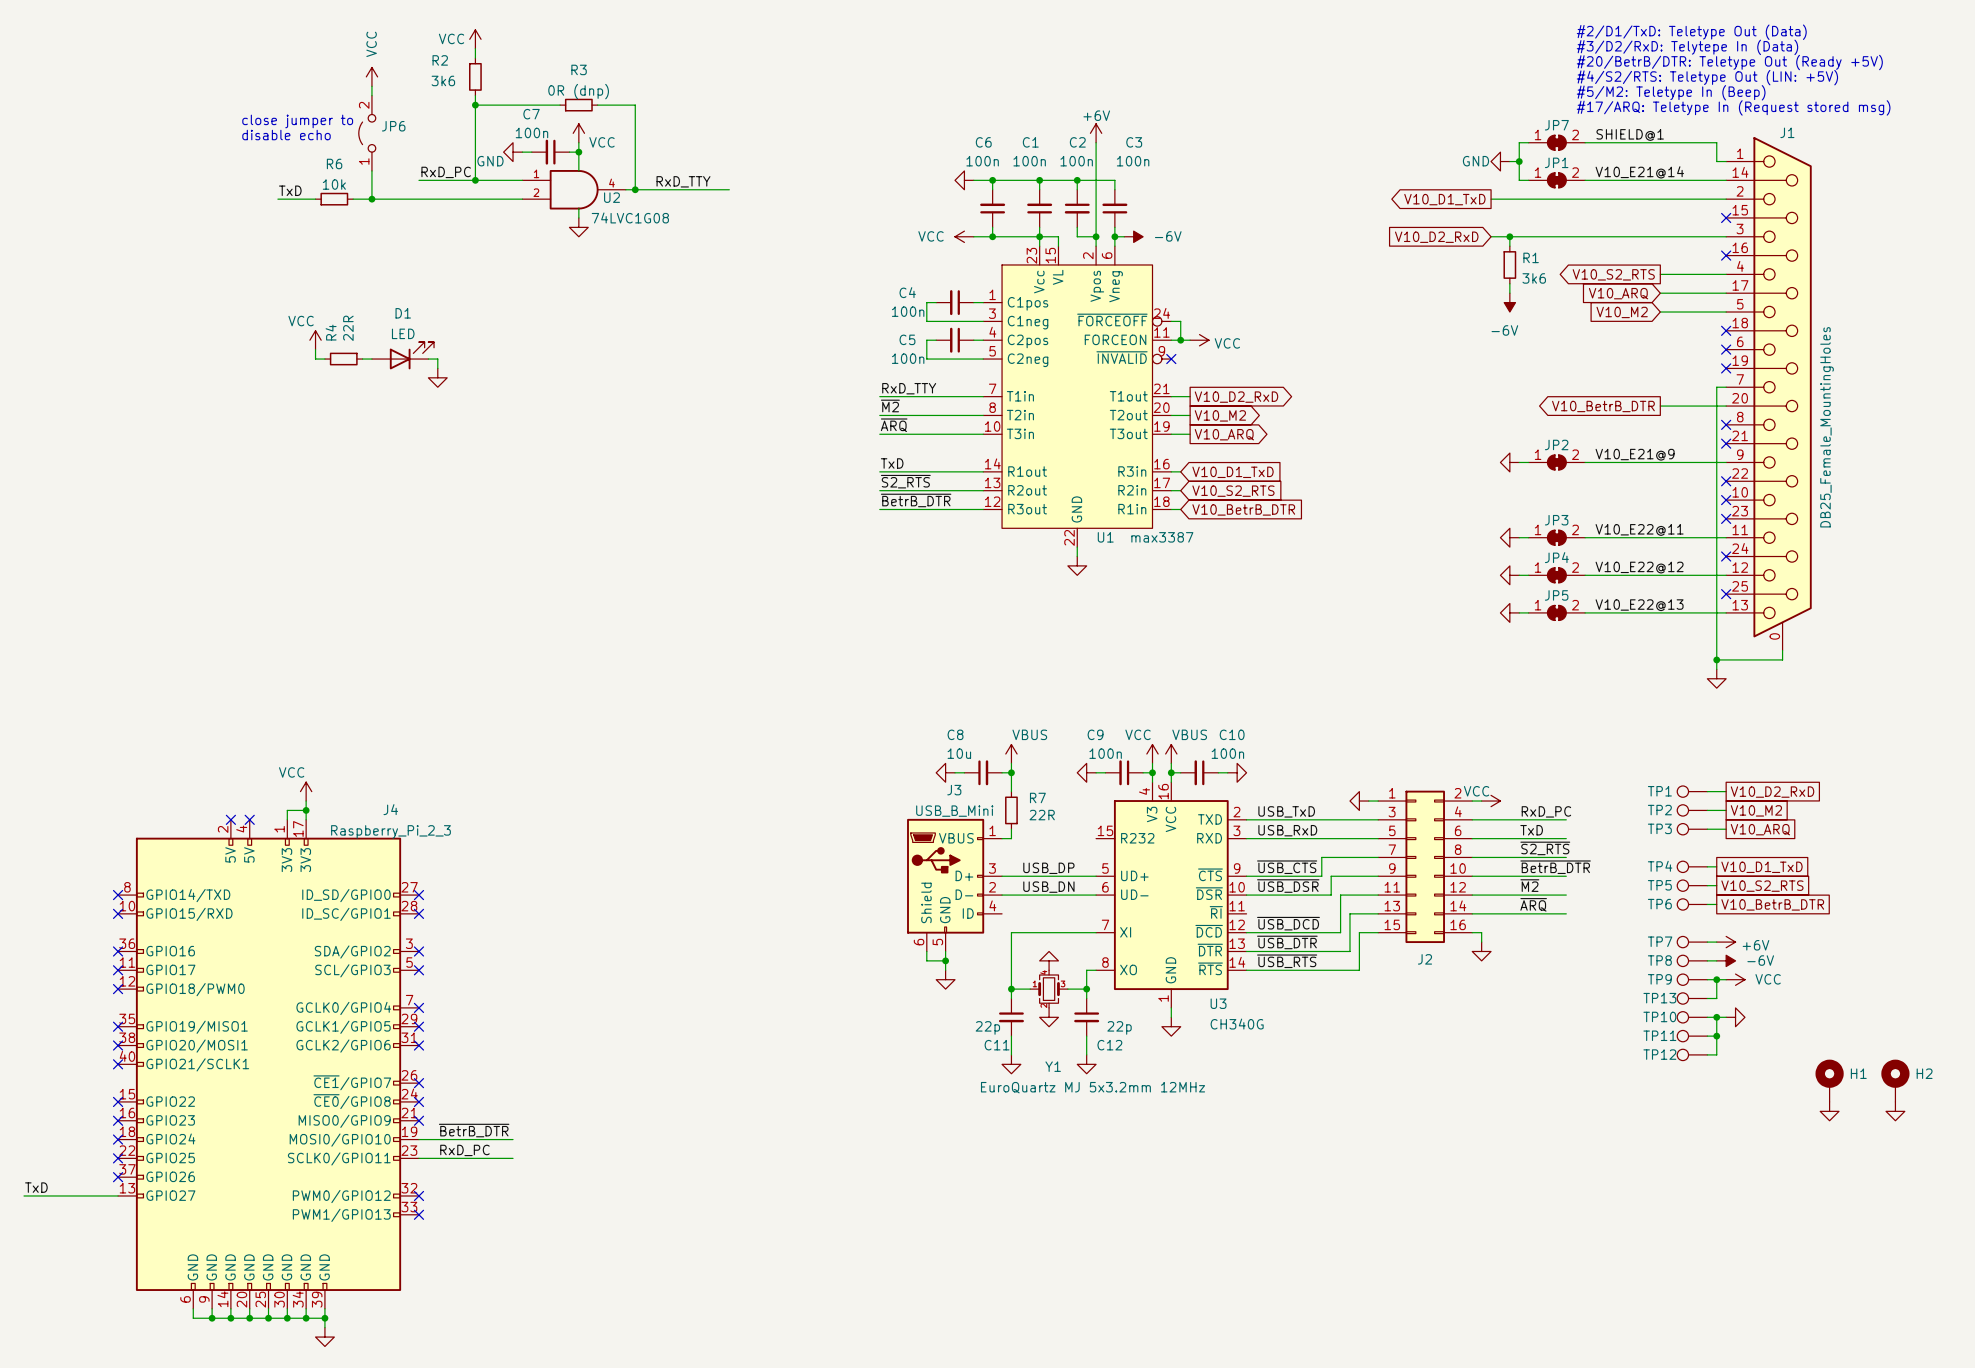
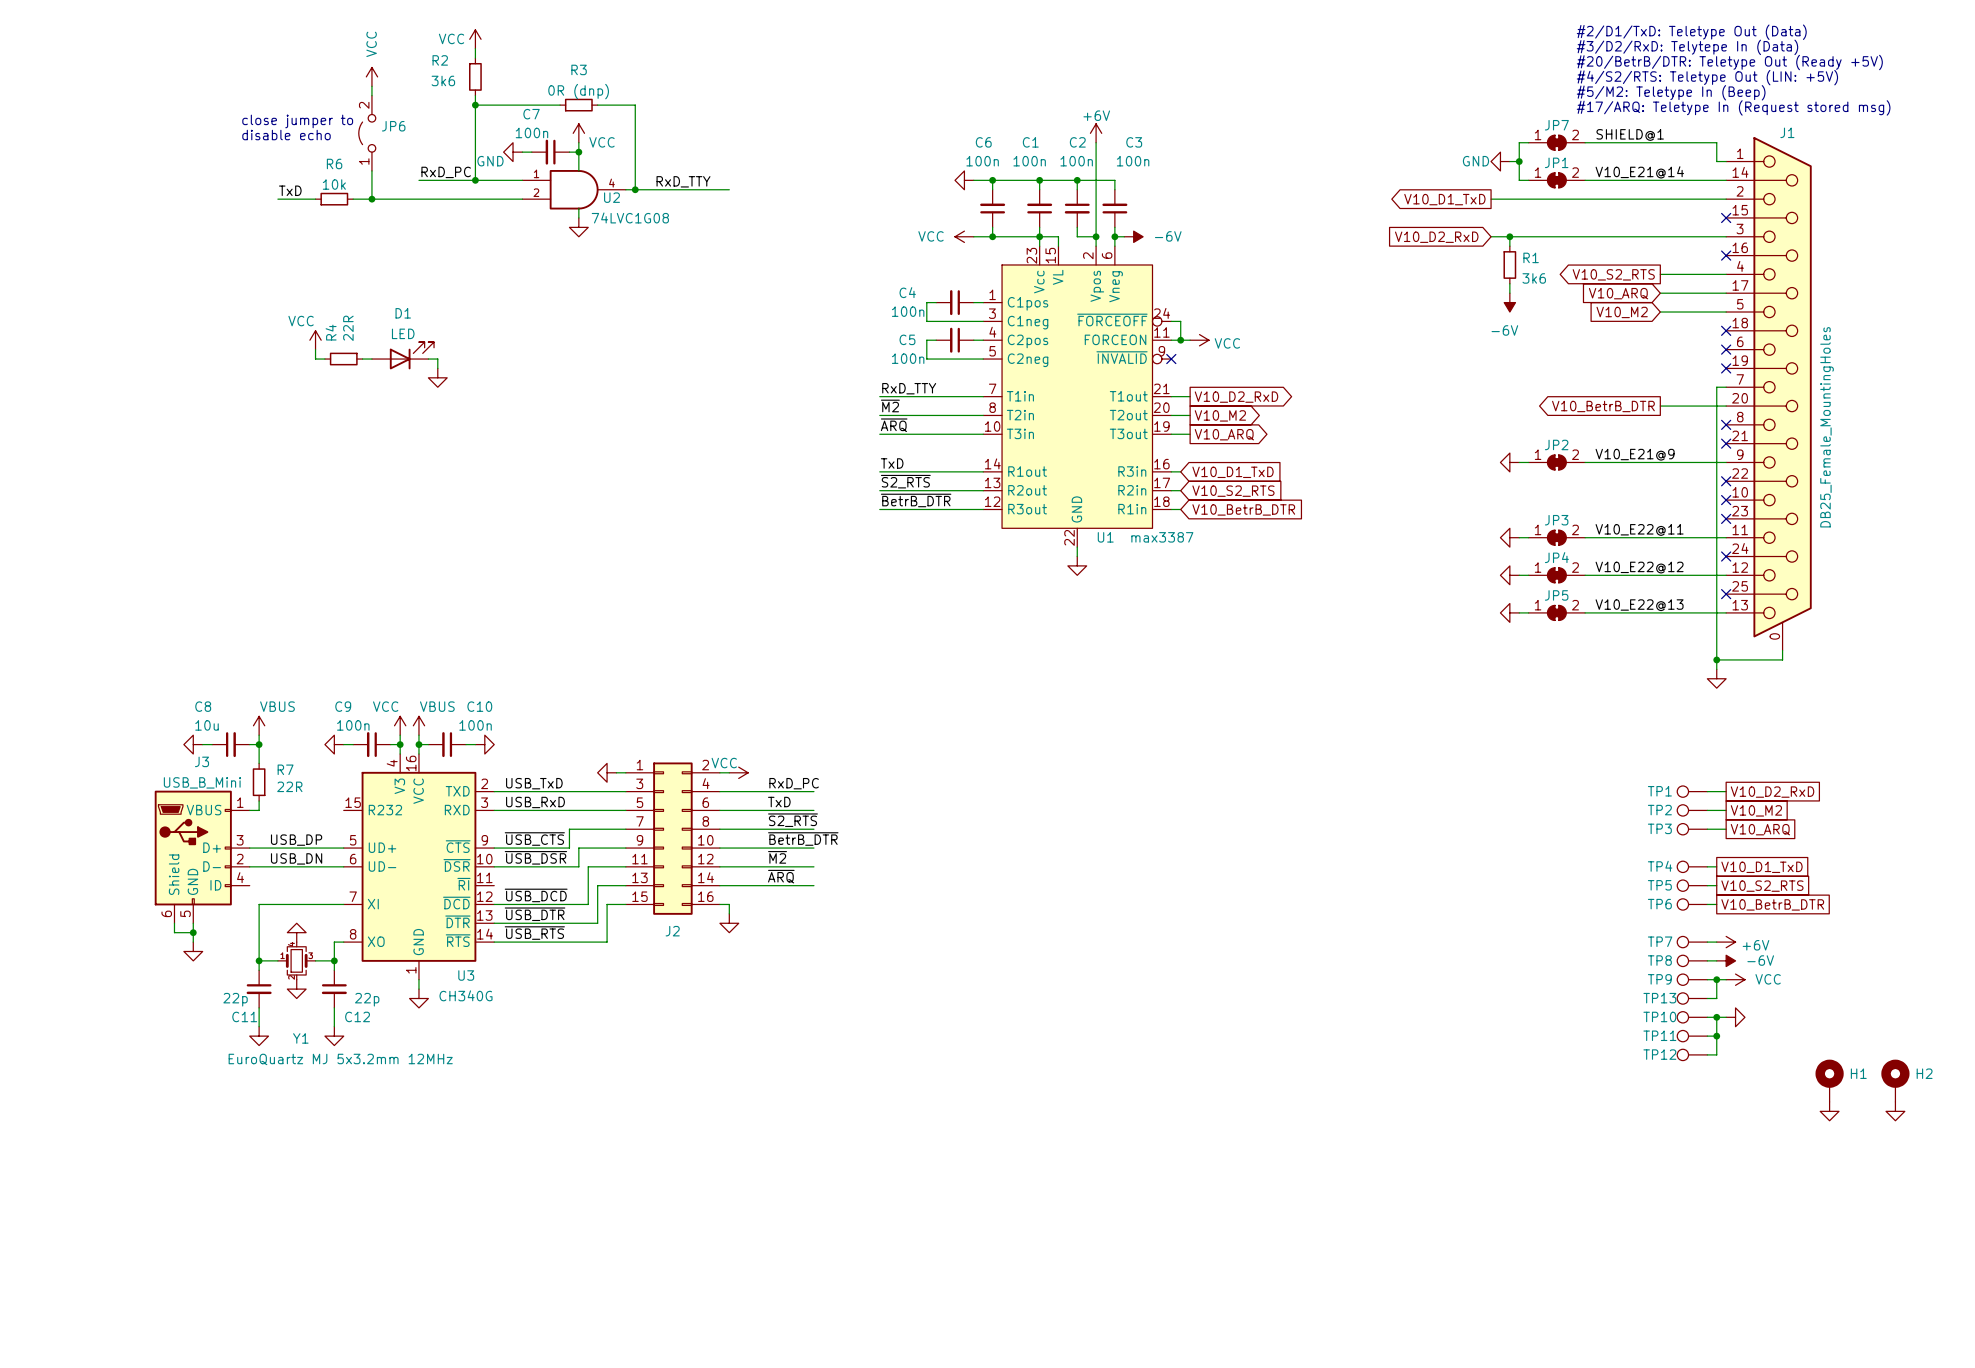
power symbol: none -> VBUS (259, 725)
power symbol: none -> VBUS (418, 725)
wire: none -> (259, 735) (259, 763)
wire: none -> (418, 735) (418, 753)
power symbol: none -> (193, 744)
wire: none -> (202, 744) (212, 744)
wire: none -> (249, 744) (259, 744)
junction: none -> (259, 744)
power symbol: none -> (334, 744)
wire: none -> (343, 744) (353, 744)
wire: none -> (390, 744) (400, 744)
junction: none -> (400, 744)
wire: none -> (418, 744) (428, 744)
junction: none -> (418, 744)
wire: none -> (466, 744) (475, 744)
power symbol: none -> (484, 744)
power symbol: VBUS (1011, 753) -> none
power symbol: VCC (1152, 753) -> none
power symbol: VBUS (1171, 753) -> none
wire: (1011, 763) (1011, 791) -> none
wire: (1152, 763) (1152, 782) -> none
wire: (1171, 763) (1171, 782) -> none
power symbol: none -> (607, 772)
wire: none -> (616, 772) (625, 772)
wire: none -> (719, 772) (729, 772)
power symbol: none -> VCC (738, 772)
power symbol: (945, 772) -> none
wire: (955, 772) (964, 772) -> none
C8 position: (983, 772) -> (230, 744)
wire: (1002, 772) (1011, 772) -> none
junction: (1011, 772) -> none
power symbol: (1086, 772) -> none
wire: (1096, 772) (1105, 772) -> none
C9 position: (1124, 772) -> (371, 744)
wire: (1143, 772) (1152, 772) -> none
junction: (1152, 772) -> none
wire: (1171, 772) (1180, 772) -> none
junction: (1171, 772) -> none
C10 position: (1199, 772) -> (447, 744)
wire: (1218, 772) (1227, 772) -> none
power symbol: (1237, 772) -> none
label: none -> USB_TxD (534, 783)
label: none -> RxD_PC (794, 783)
power symbol position: VCC (306, 791) -> VCC (400, 725)
wire: none -> (494, 791) (625, 791)
wire: none -> (719, 791) (813, 791)
wire: none -> (259, 801) (259, 810) (249, 810)
wire: (306, 801) (306, 819) -> (400, 735) (400, 753)
power symbol: (1359, 801) -> none
wire: (1368, 801) (1378, 801) -> none
wire: (1472, 801) (1481, 801) -> none
power symbol: VCC (1491, 801) -> none
label: none -> USB_RxD (535, 802)
label: none -> TxD (779, 802)
wire: (306, 810) (287, 810) (287, 819) -> none
junction: (306, 810) -> none
wire: none -> (494, 810) (625, 810)
wire: none -> (719, 810) (813, 810)
R7 position: (1011, 810) -> (259, 782)
label: USB_TxD (1286, 811) -> none
label: RxD_PC (1546, 811) -> none
no-connect mark: (230, 819) -> none
no-connect mark: (249, 819) -> none
wire: (1246, 819) (1378, 819) -> none
wire: (1472, 819) (1566, 819) -> none
label: none -> ~{S2_RTS} (792, 820)
wire: none -> (625, 829) (569, 829) (569, 848) (494, 848)
wire: none -> (719, 829) (813, 829)
wire: (1011, 829) (1011, 838) (1002, 838) -> none
label: USB_RxD (1287, 830) -> none
label: TxD (1531, 830) -> none
wire: (1246, 838) (1378, 838) -> none
wire: (1472, 838) (1566, 838) -> none
label: none -> ~{USB_CTS} (534, 839)
label: none -> ~{BetrB_DTR} (803, 839)
label: none -> USB_DP (296, 840)
wire: none -> (625, 848) (578, 848) (578, 866) (494, 866)
wire: none -> (719, 848) (813, 848)
label: ~{S2_RTS} (1545, 848) -> none
label: none -> ~{USB_DSR} (535, 857)
label: none -> ~{M2} (777, 857)
wire: (1378, 857) (1321, 857) (1321, 876) (1246, 876) -> none
wire: (1472, 857) (1566, 857) -> none
label: none -> USB_DN (296, 858)
wire: none -> (625, 866) (588, 866) (588, 904) (494, 904)
wire: none -> (719, 866) (813, 866)
J2 position: (1425, 866) -> (672, 838)
label: ~{USB_CTS} (1287, 867) -> none
label: ~{BetrB_DTR} (1555, 867) -> none
label: USB_DP (1048, 868) -> none
label: none -> ~{ARQ} (781, 876)
wire: (1002, 876) (1096, 876) -> none
wire: (1378, 876) (1331, 876) (1331, 895) (1246, 895) -> none
wire: (1472, 876) (1566, 876) -> none
wire: none -> (625, 885) (597, 885) (597, 923) (494, 923)
wire: none -> (719, 885) (813, 885)
J3 position: (954, 885) -> (202, 856)
label: ~{M2} (1529, 885) -> none
label: ~{USB_DSR} (1288, 886) -> none
label: USB_DN (1048, 887) -> none
no-connect mark: (118, 895) -> none
no-connect mark: (418, 895) -> none
label: none -> ~{USB_DCD} (536, 895)
wire: (1002, 895) (1096, 895) -> none
U3 position: (1171, 895) -> (418, 866)
wire: (1378, 895) (1340, 895) (1340, 932) (1246, 932) -> none
wire: (1472, 895) (1566, 895) -> none
wire: none -> (625, 904) (607, 904) (607, 942) (494, 942)
wire: none -> (719, 904) (729, 904) (729, 913)
label: ~{ARQ} (1533, 904) -> none
no-connect mark: (118, 913) -> none
no-connect mark: (418, 913) -> none
wire: (1378, 913) (1349, 913) (1349, 951) (1246, 951) -> none
wire: (1472, 913) (1566, 913) -> none
label: none -> ~{USB_DTR} (535, 914)
power symbol: none -> (729, 923)
label: ~{USB_DCD} (1288, 923) -> none
junction: none -> (193, 932)
power symbol: none -> (296, 932)
wire: (1096, 932) (1011, 932) (1011, 998) -> none
wire: (1378, 932) (1359, 932) (1359, 970) (1246, 970) -> none
wire: (1472, 932) (1481, 932) (1481, 942) -> none
label: none -> ~{USB_RTS} (534, 933)
label: ~{USB_DTR} (1287, 942) -> none
no-connect mark: (118, 951) -> none
power symbol: none -> (193, 951)
no-connect mark: (418, 951) -> none
wire: (926, 951) (926, 960) (945, 960) -> none
wire: (945, 951) (945, 970) -> none
power symbol: (1481, 951) -> none
junction: none -> (259, 960)
junction: none -> (334, 960)
junction: (945, 960) -> none
power symbol: (1049, 960) -> none
label: ~{USB_RTS} (1287, 961) -> none
no-connect mark: (118, 970) -> none
no-connect mark: (418, 970) -> none
wire: (1096, 970) (1086, 970) (1086, 998) -> none
wire: none -> (418, 979) (418, 989)
power symbol: (945, 979) -> none
no-connect mark: (118, 989) -> none
power symbol: none -> (296, 989)
wire: (1011, 989) (1030, 989) -> none
junction: (1011, 989) -> none
Y1 position: (1049, 989) -> (296, 960)
wire: (1067, 989) (1086, 989) -> none
junction: (1086, 989) -> none
power symbol: none -> (418, 998)
no-connect mark: (418, 1007) -> none
wire: (1171, 1007) (1171, 1017) -> none
C11 position: (1011, 1017) -> (259, 989)
power symbol: (1049, 1017) -> none
C12 position: (1086, 1017) -> (334, 989)
U3 value position: CH340G (1237, 1024) -> CH340G (466, 995)
no-connect mark: (118, 1026) -> none
no-connect mark: (418, 1026) -> none
power symbol: (1171, 1026) -> none
power symbol: none -> (259, 1036)
power symbol: none -> (334, 1036)
wire: (1011, 1036) (1011, 1054) -> none
wire: (1086, 1036) (1086, 1054) -> none
no-connect mark: (118, 1045) -> none
no-connect mark: (418, 1045) -> none
no-connect mark: (118, 1064) -> none
J4: Raspberry_Pi_2_3 (268, 1064) -> none
power symbol: (1011, 1064) -> none
power symbol: (1086, 1064) -> none
no-connect mark: (418, 1083) -> none
no-connect mark: (118, 1101) -> none
no-connect mark: (418, 1101) -> none
no-connect mark: (118, 1120) -> none
no-connect mark: (418, 1120) -> none
label: ~{BetrB_DTR} (474, 1130) -> none
no-connect mark: (118, 1139) -> none
wire: (418, 1139) (513, 1139) -> none
label: RxD_PC (464, 1150) -> none
no-connect mark: (118, 1158) -> none
wire: (418, 1158) (513, 1158) -> none
no-connect mark: (118, 1177) -> none
label: TxD (36, 1187) -> none
wire: (24, 1195) (118, 1195) -> none
no-connect mark: (418, 1195) -> none
no-connect mark: (418, 1214) -> none
wire: (193, 1308) (193, 1318) (324, 1318) -> none
wire: (212, 1308) (212, 1318) -> none
wire: (230, 1308) (230, 1318) -> none
wire: (249, 1308) (249, 1318) -> none
wire: (268, 1308) (268, 1318) -> none
wire: (287, 1308) (287, 1318) -> none
wire: (306, 1308) (306, 1318) -> none
wire: (324, 1308) (324, 1327) -> none
junction: (212, 1318) -> none
junction: (230, 1318) -> none
junction: (249, 1318) -> none
junction: (268, 1318) -> none
junction: (287, 1318) -> none
junction: (306, 1318) -> none
junction: (324, 1318) -> none
power symbol: (324, 1337) -> none

